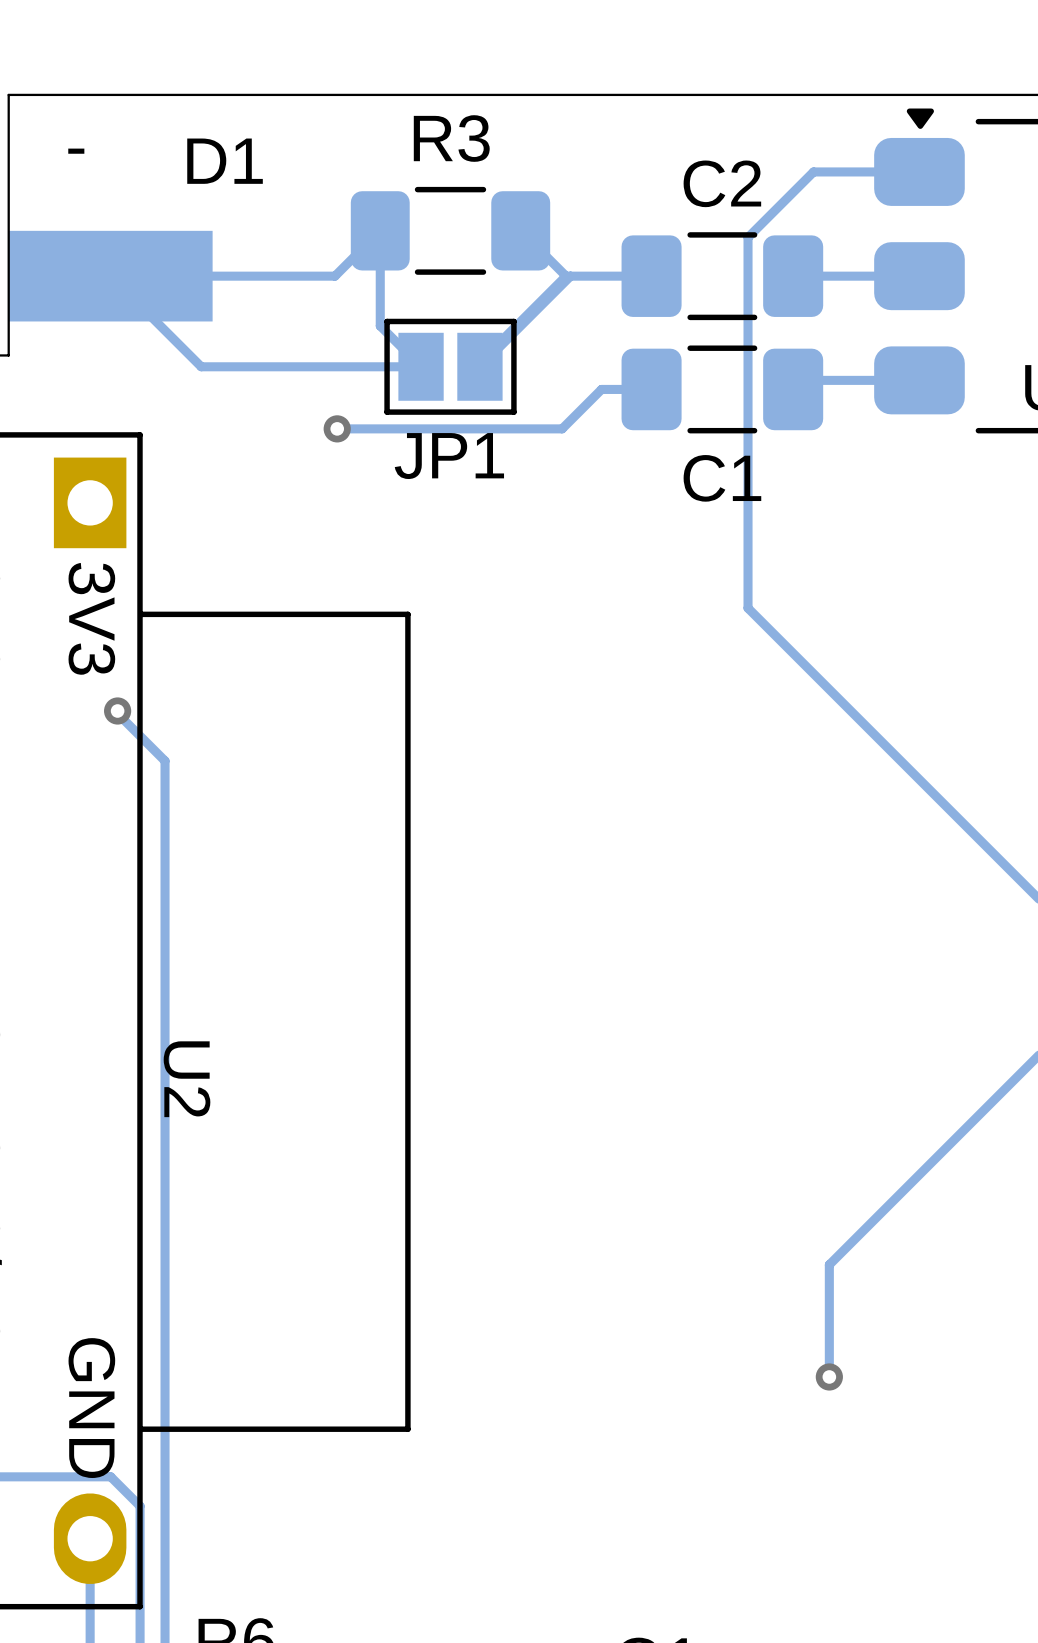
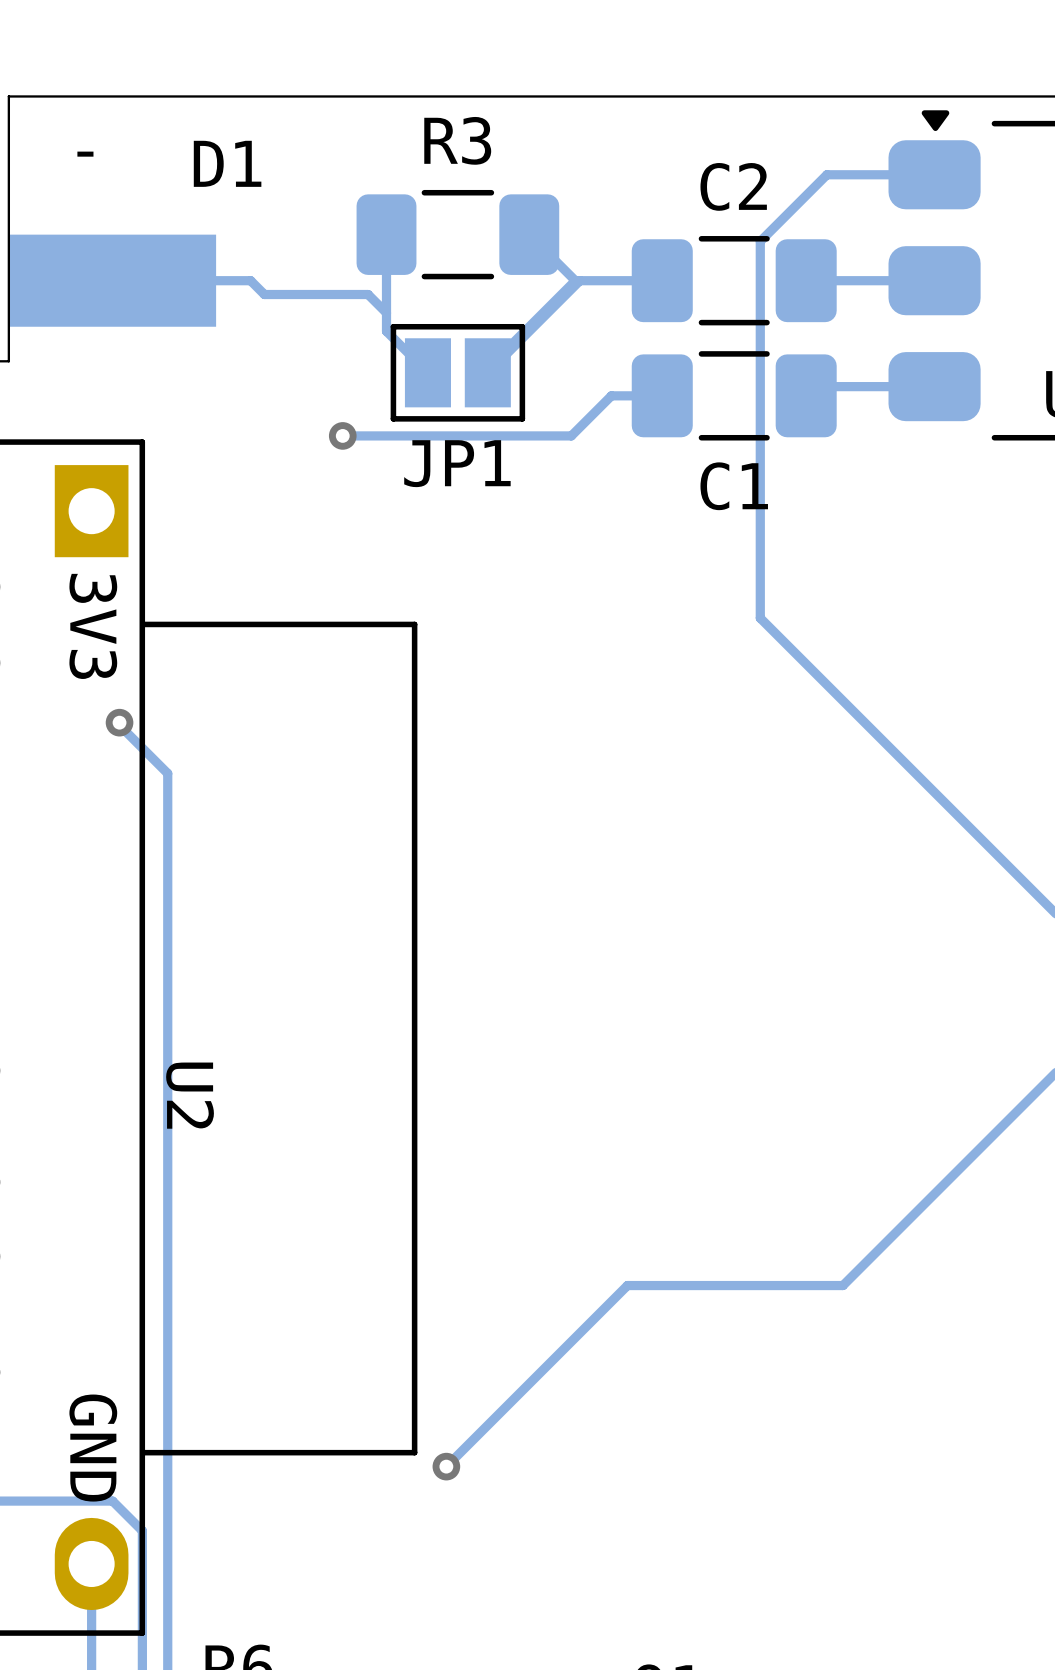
track: (380, 230) (334, 276) (246, 276) -> (386, 312) (368, 294) (264, 294) (250, 280)
track: (110, 276) (201, 366) (421, 366) -> none
track: (829, 1264) (829, 1376) -> (842, 1285) (627, 1285) (446, 1466)
via: (829, 1376) -> none
via: none -> (446, 1466)

